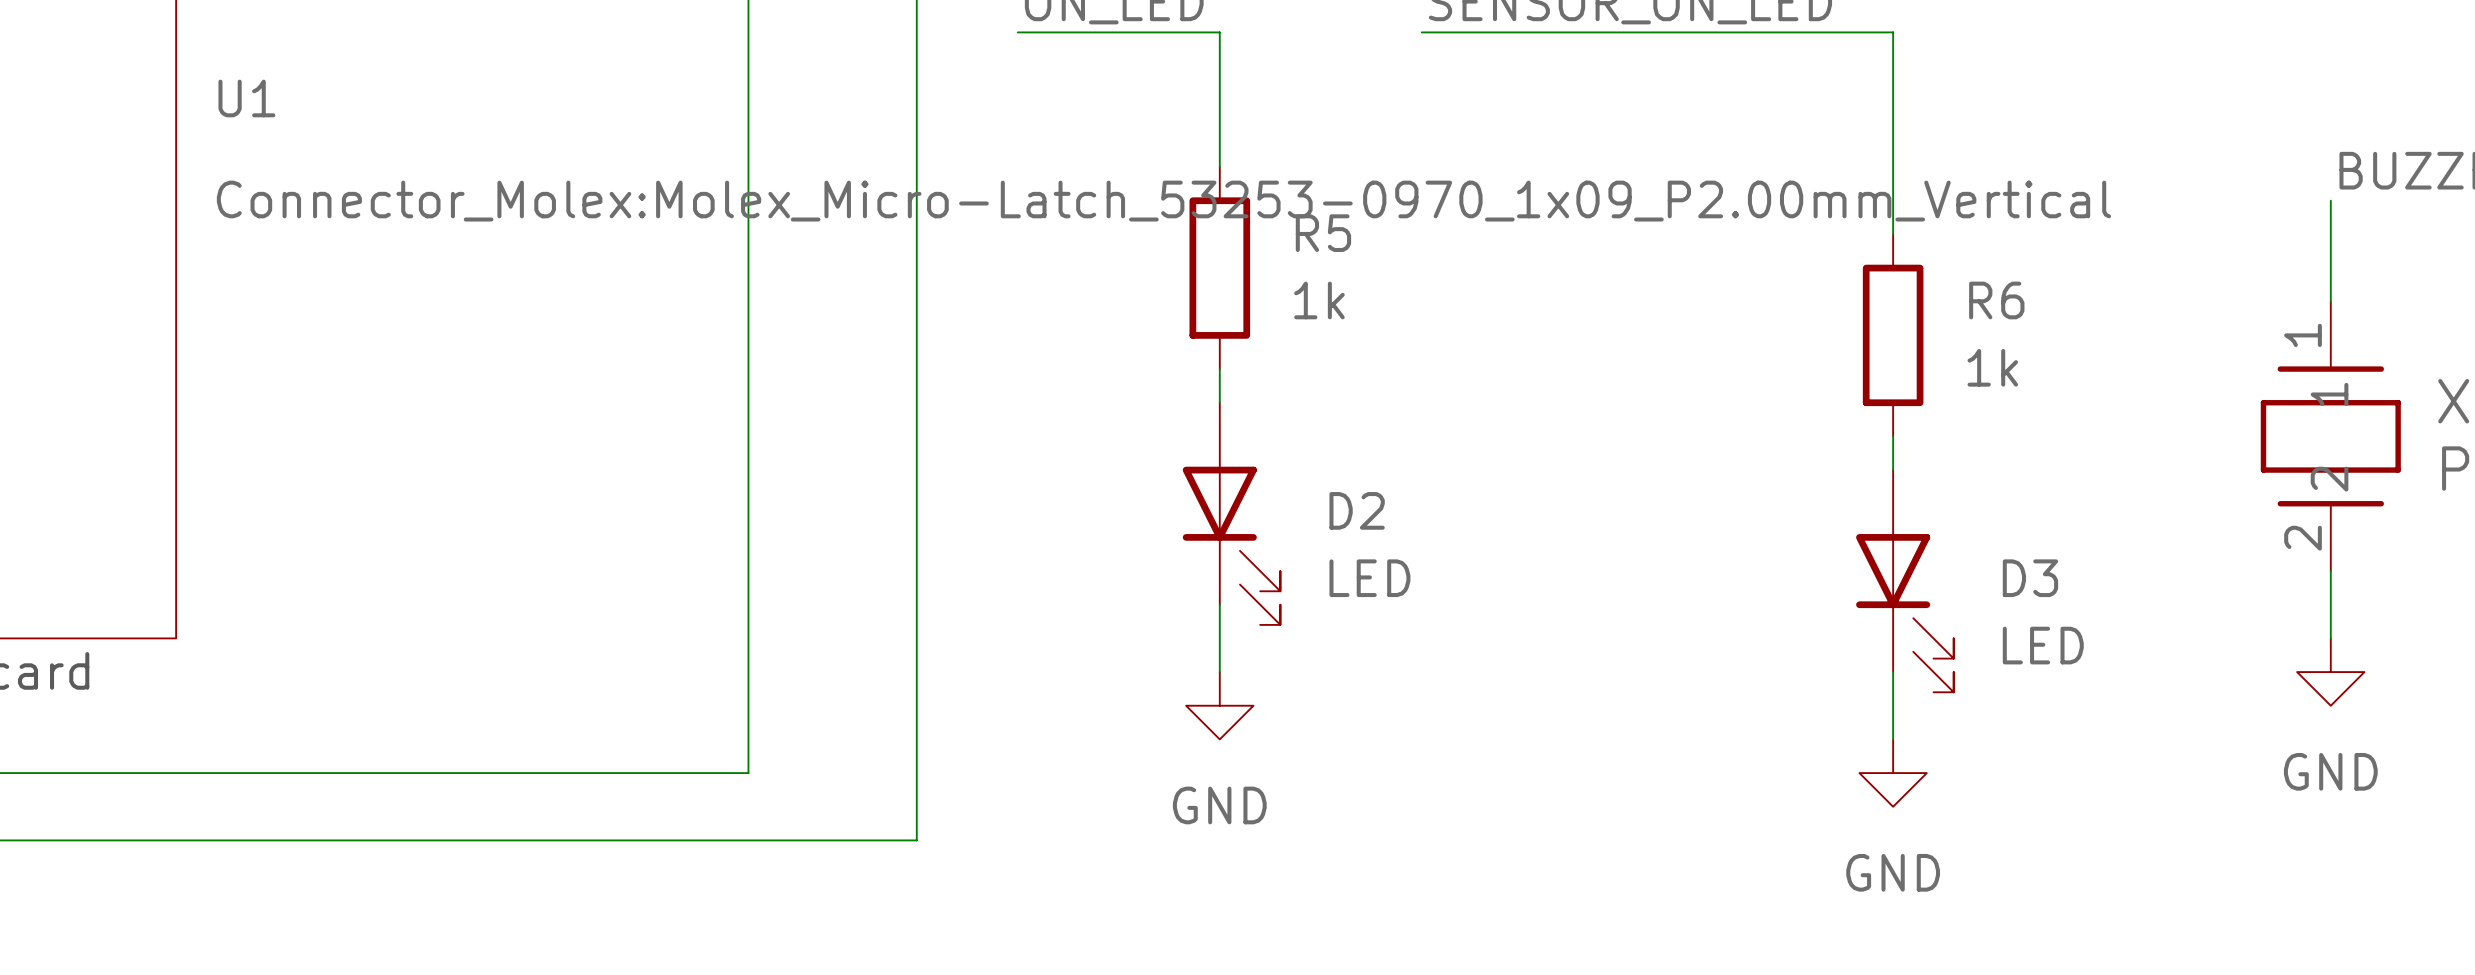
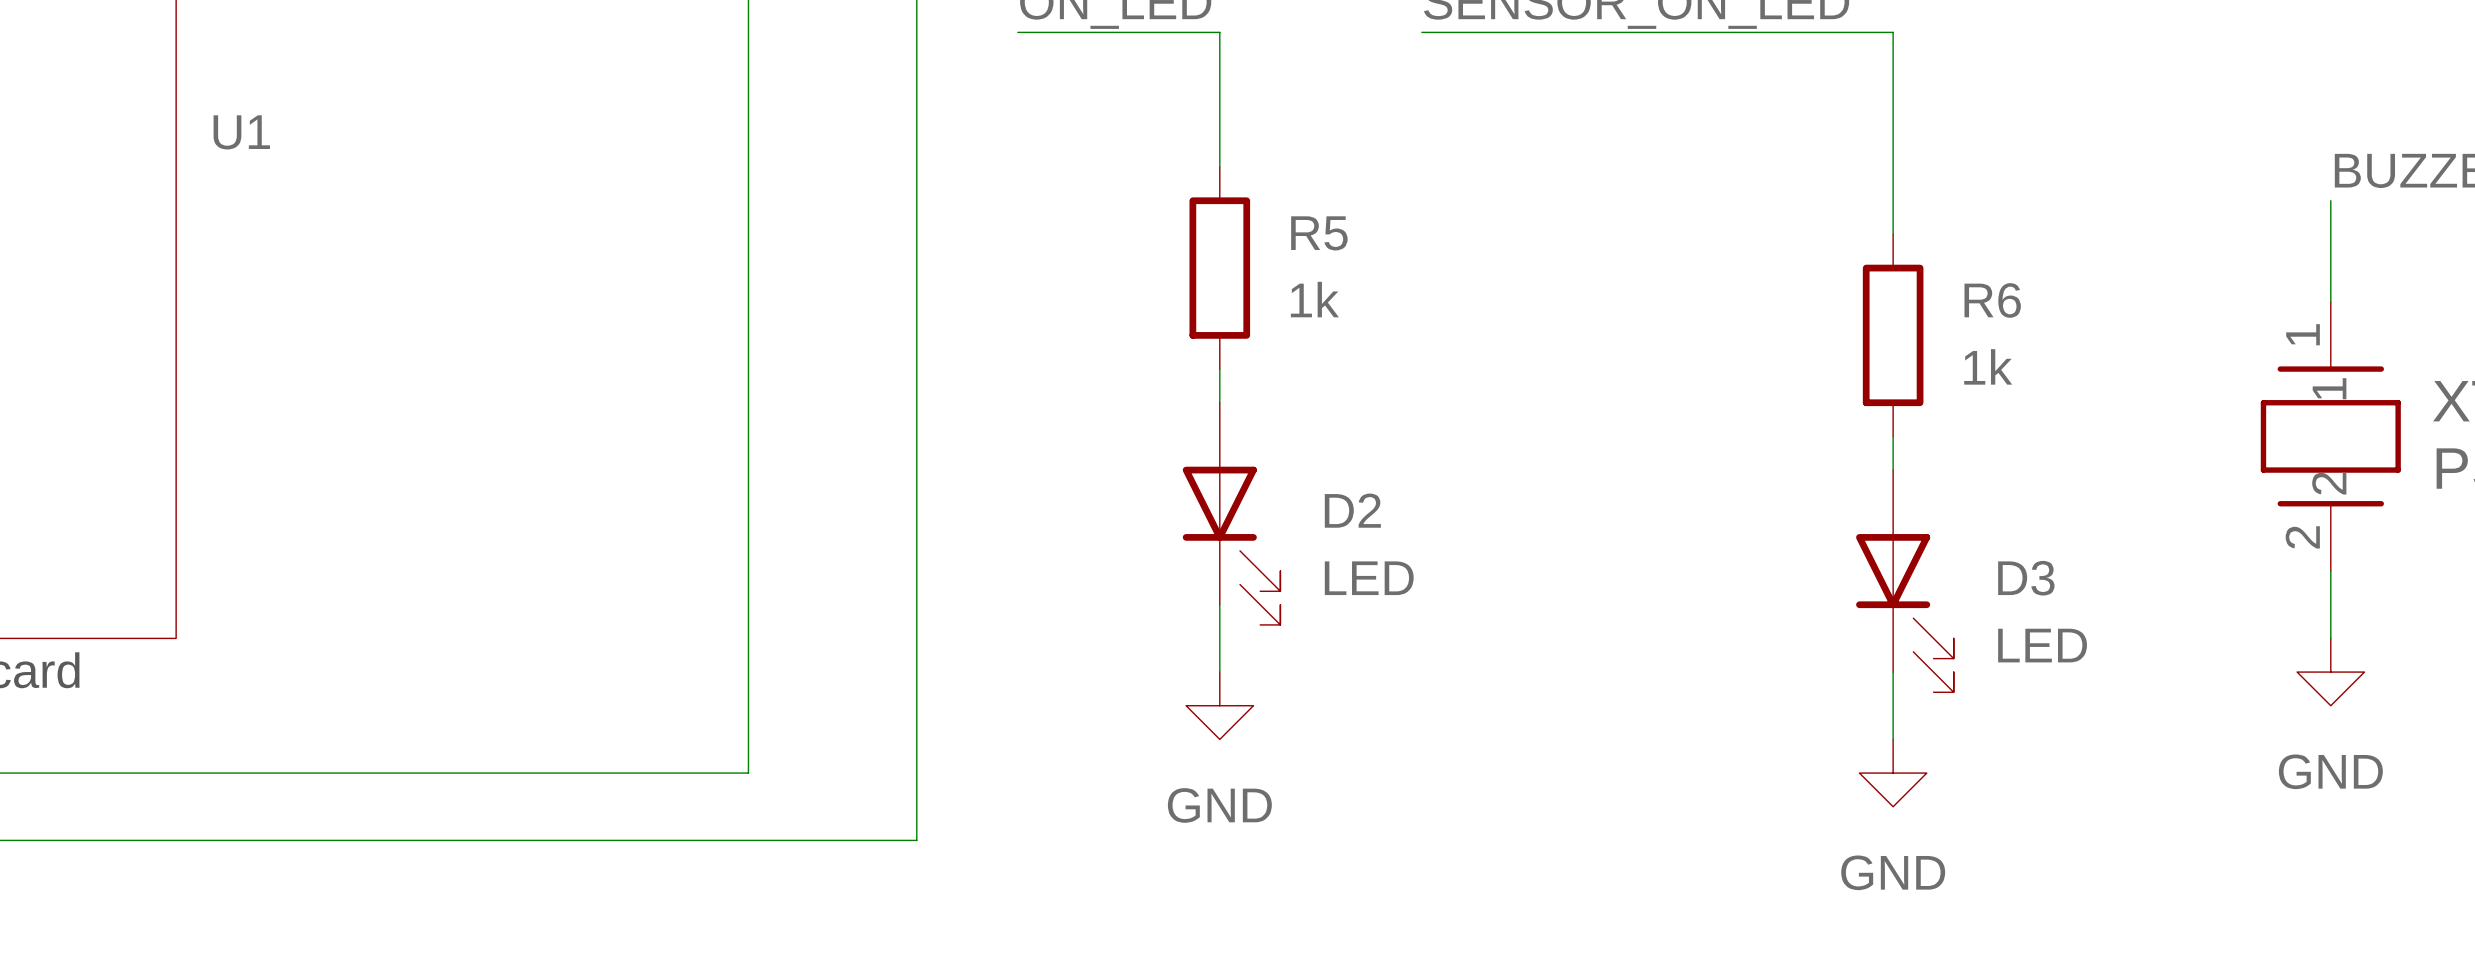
U1 name position: U1 (246, 98) -> U1 (241, 132)
U1 text: Connector_Molex:Molex_Micro-Latch_53253-0970_1x09_P2.00mm_Vertical (1163, 201) -> none

